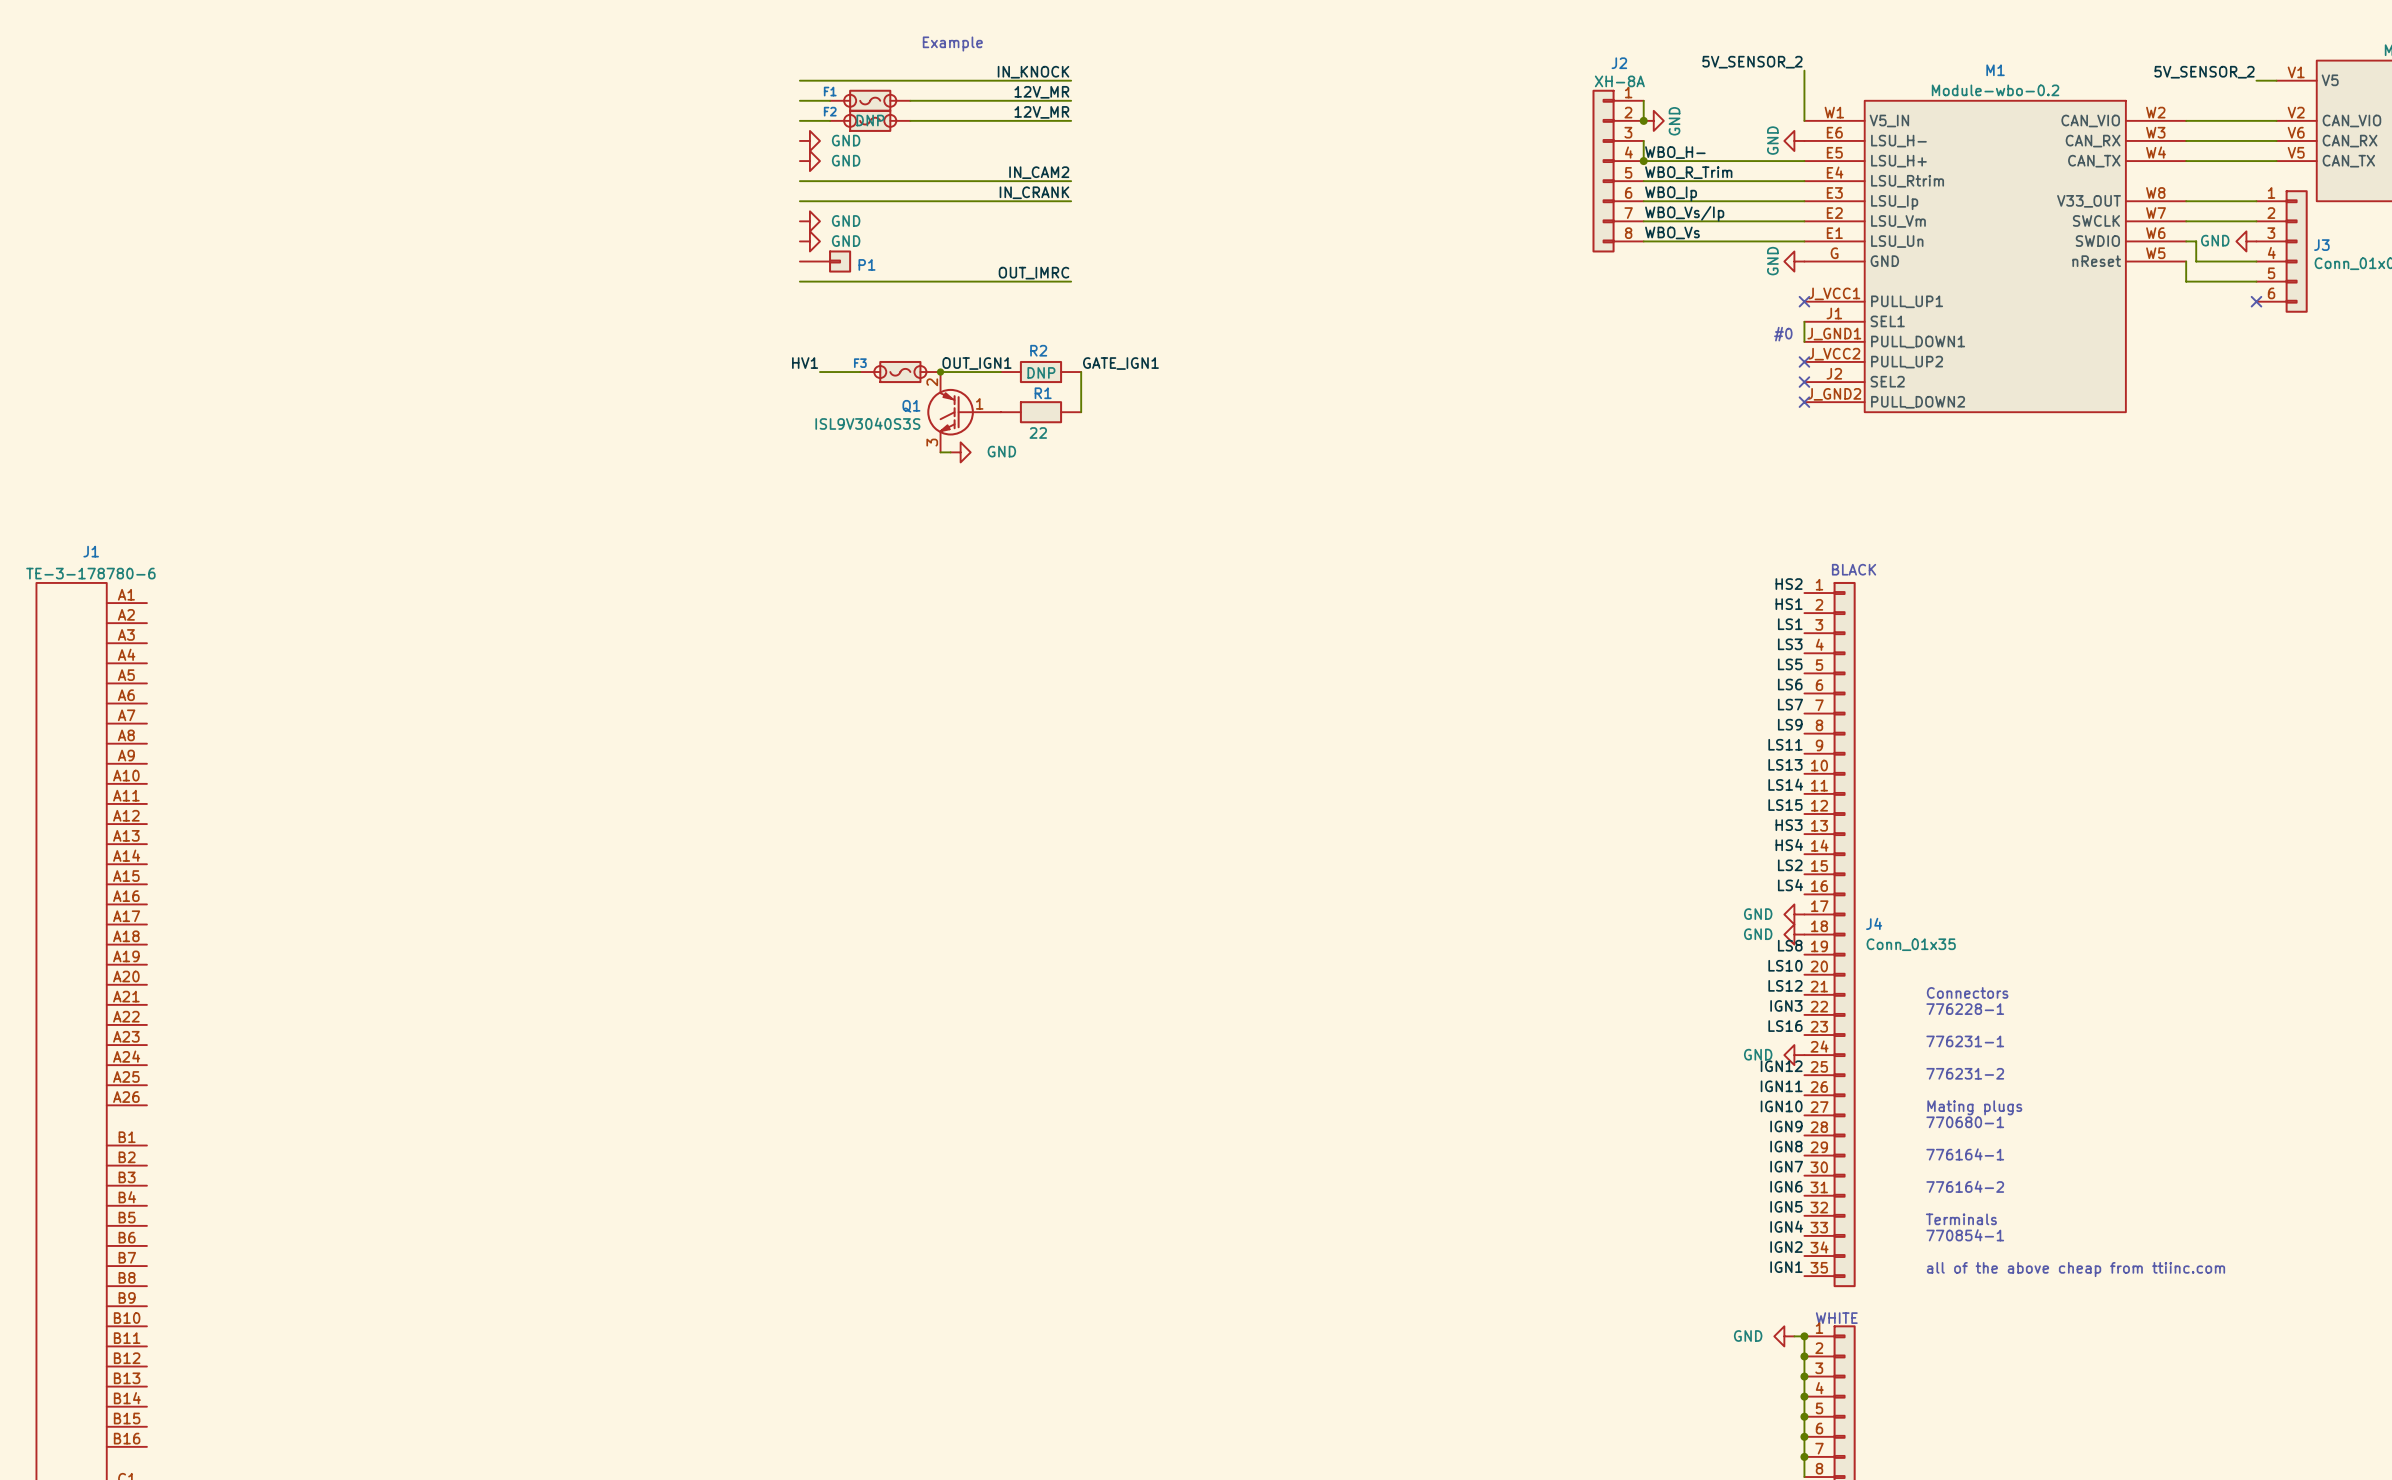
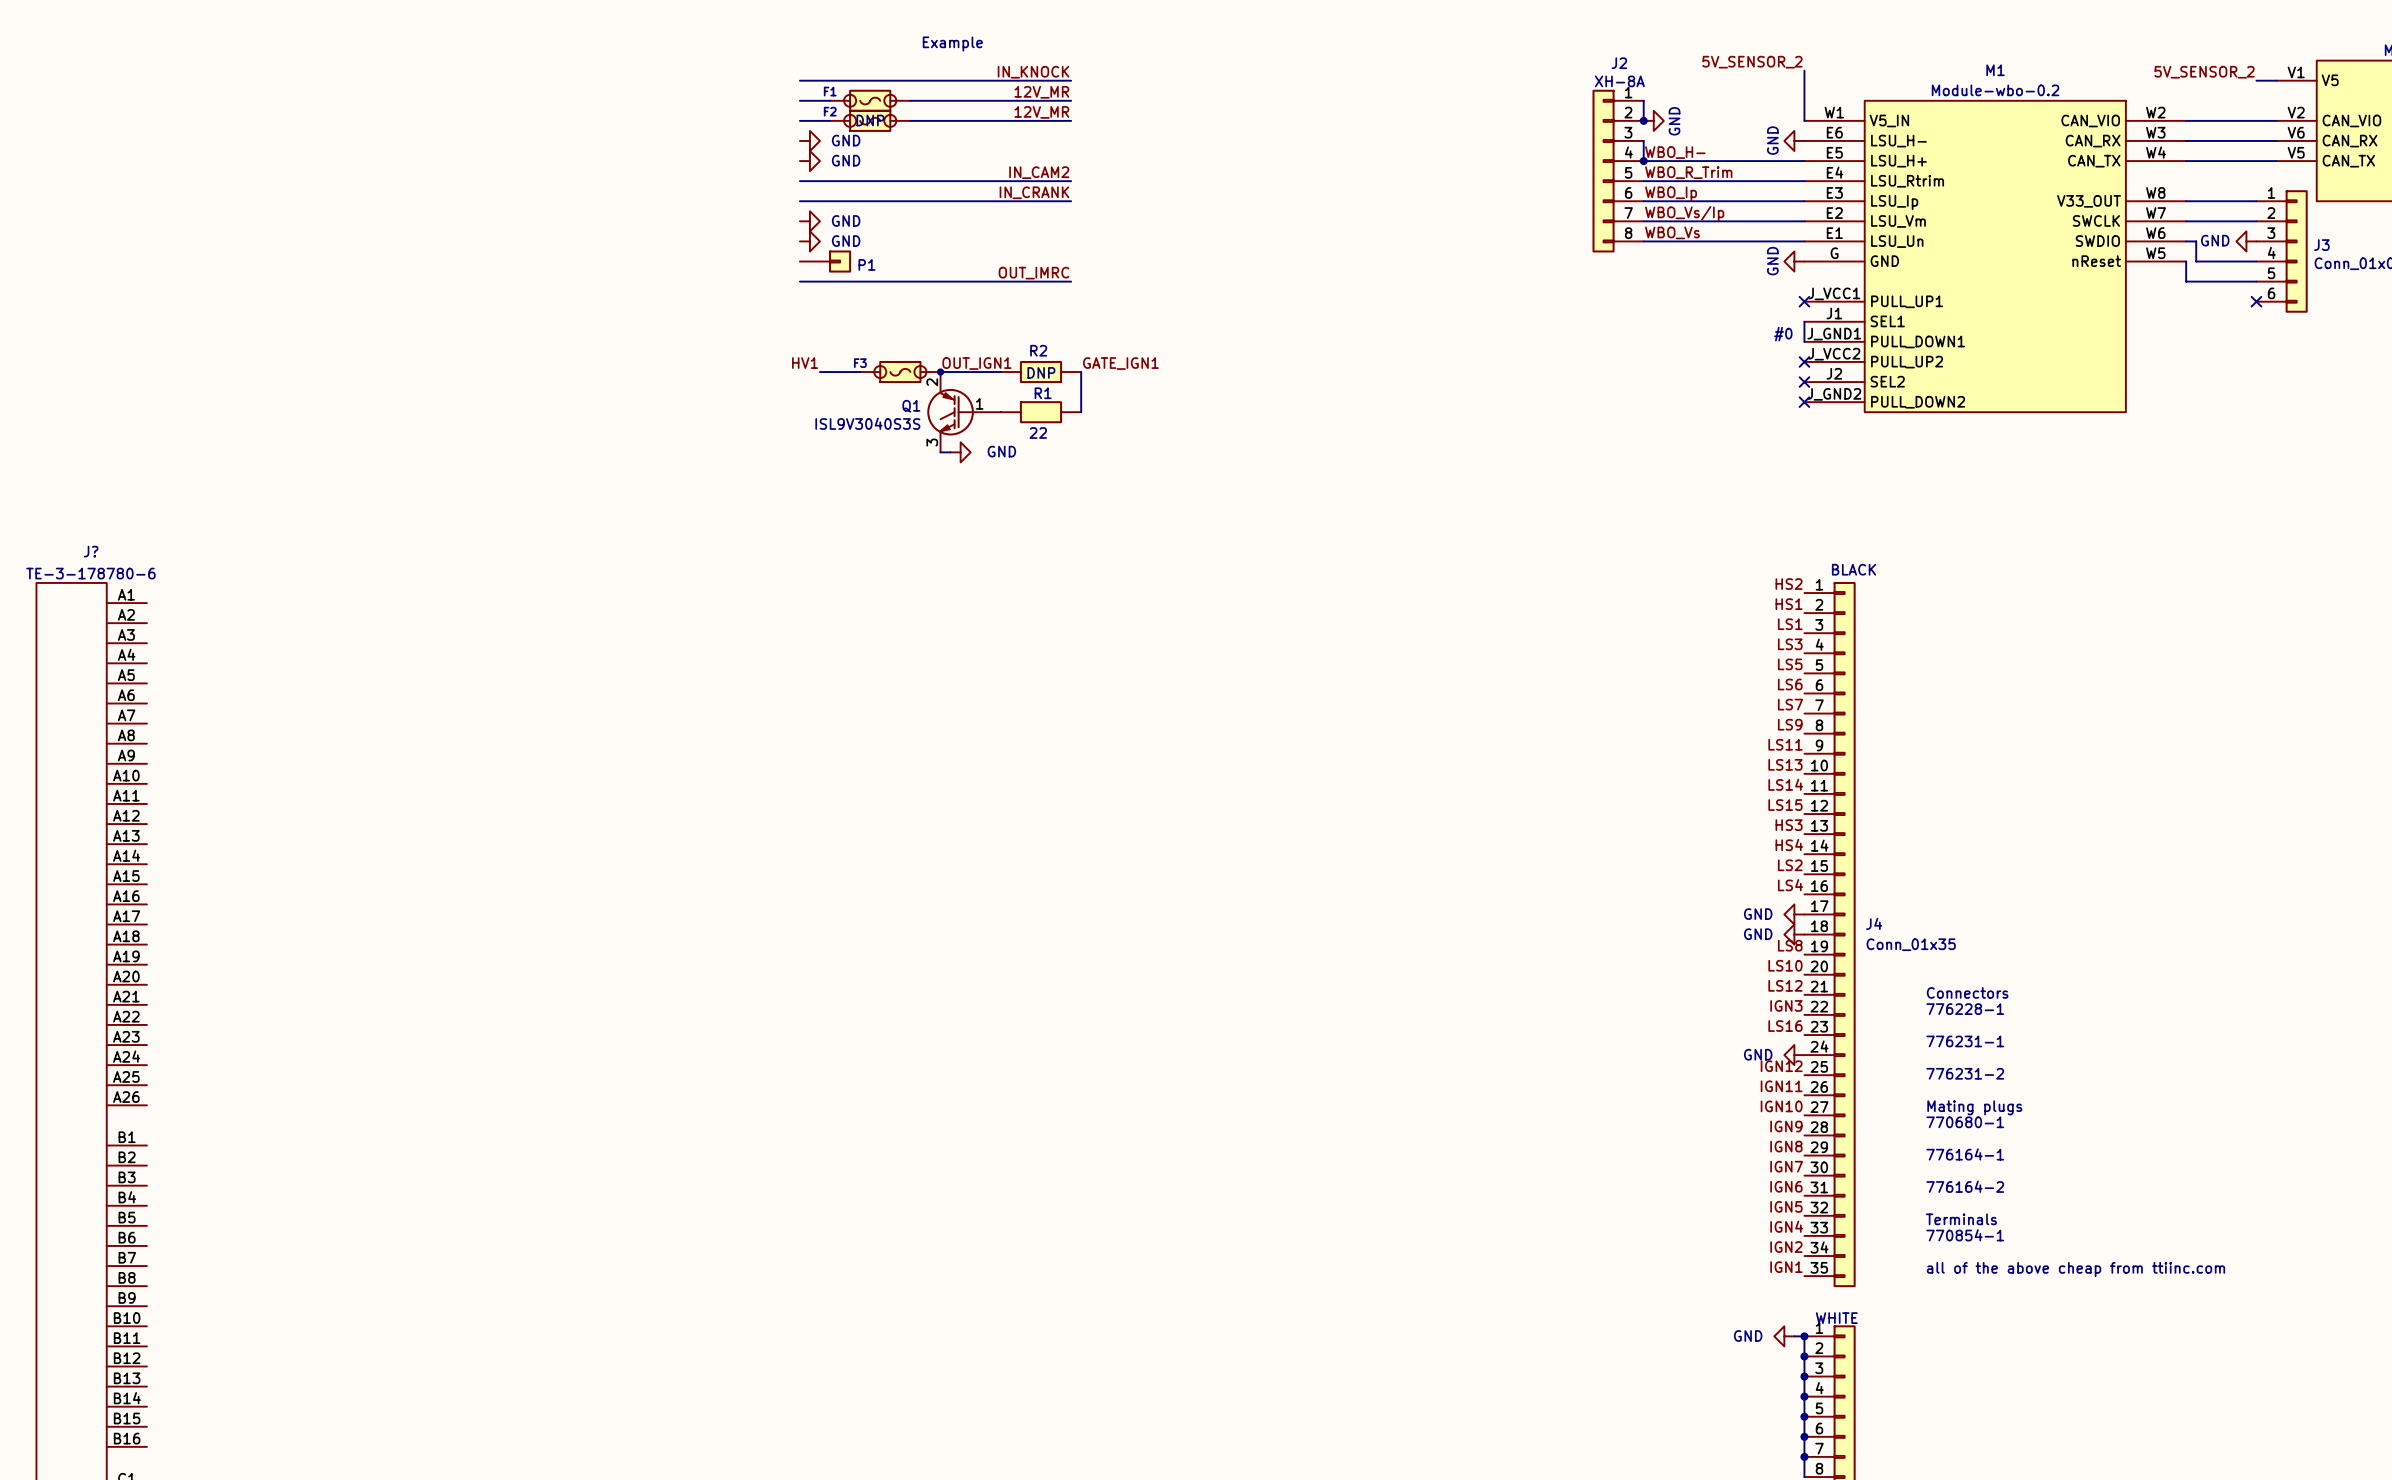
J1 name: J1 (91, 551) -> J? (91, 551)

